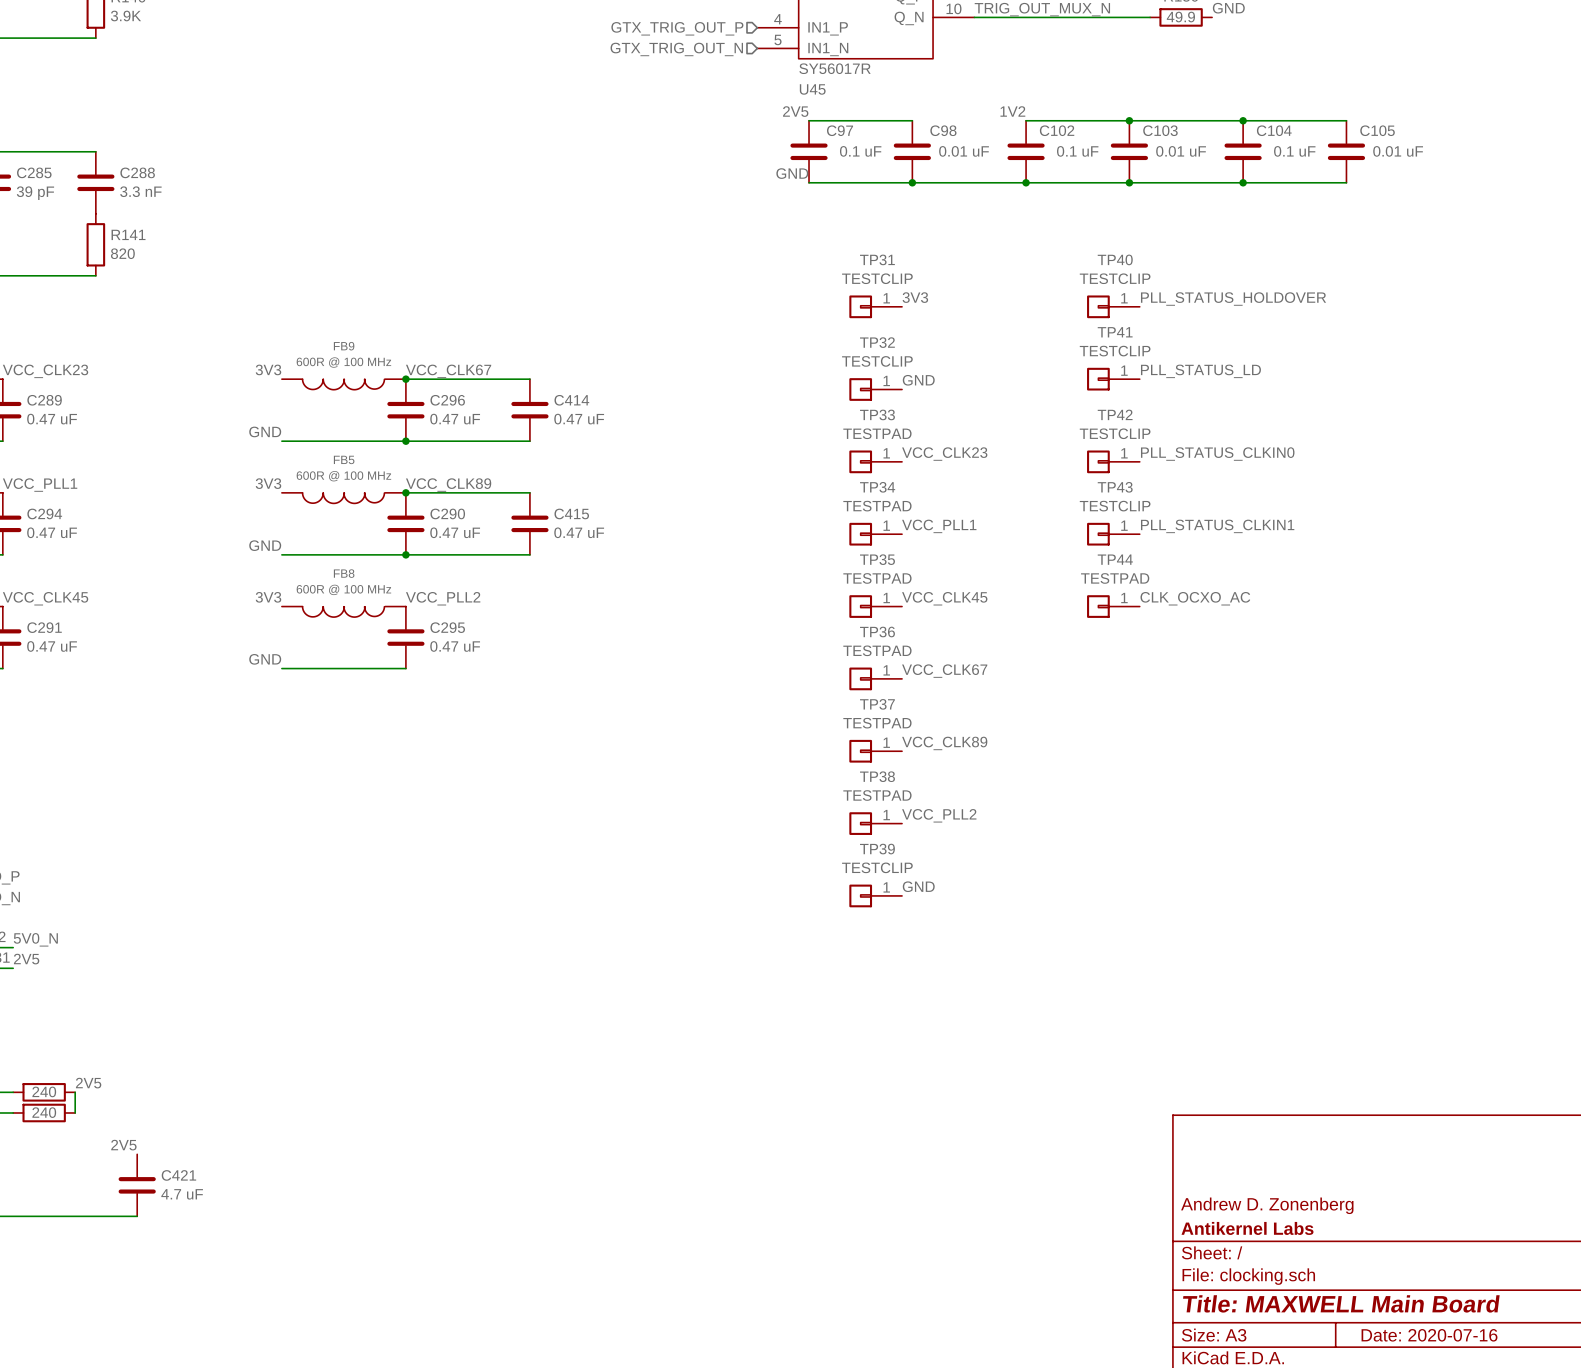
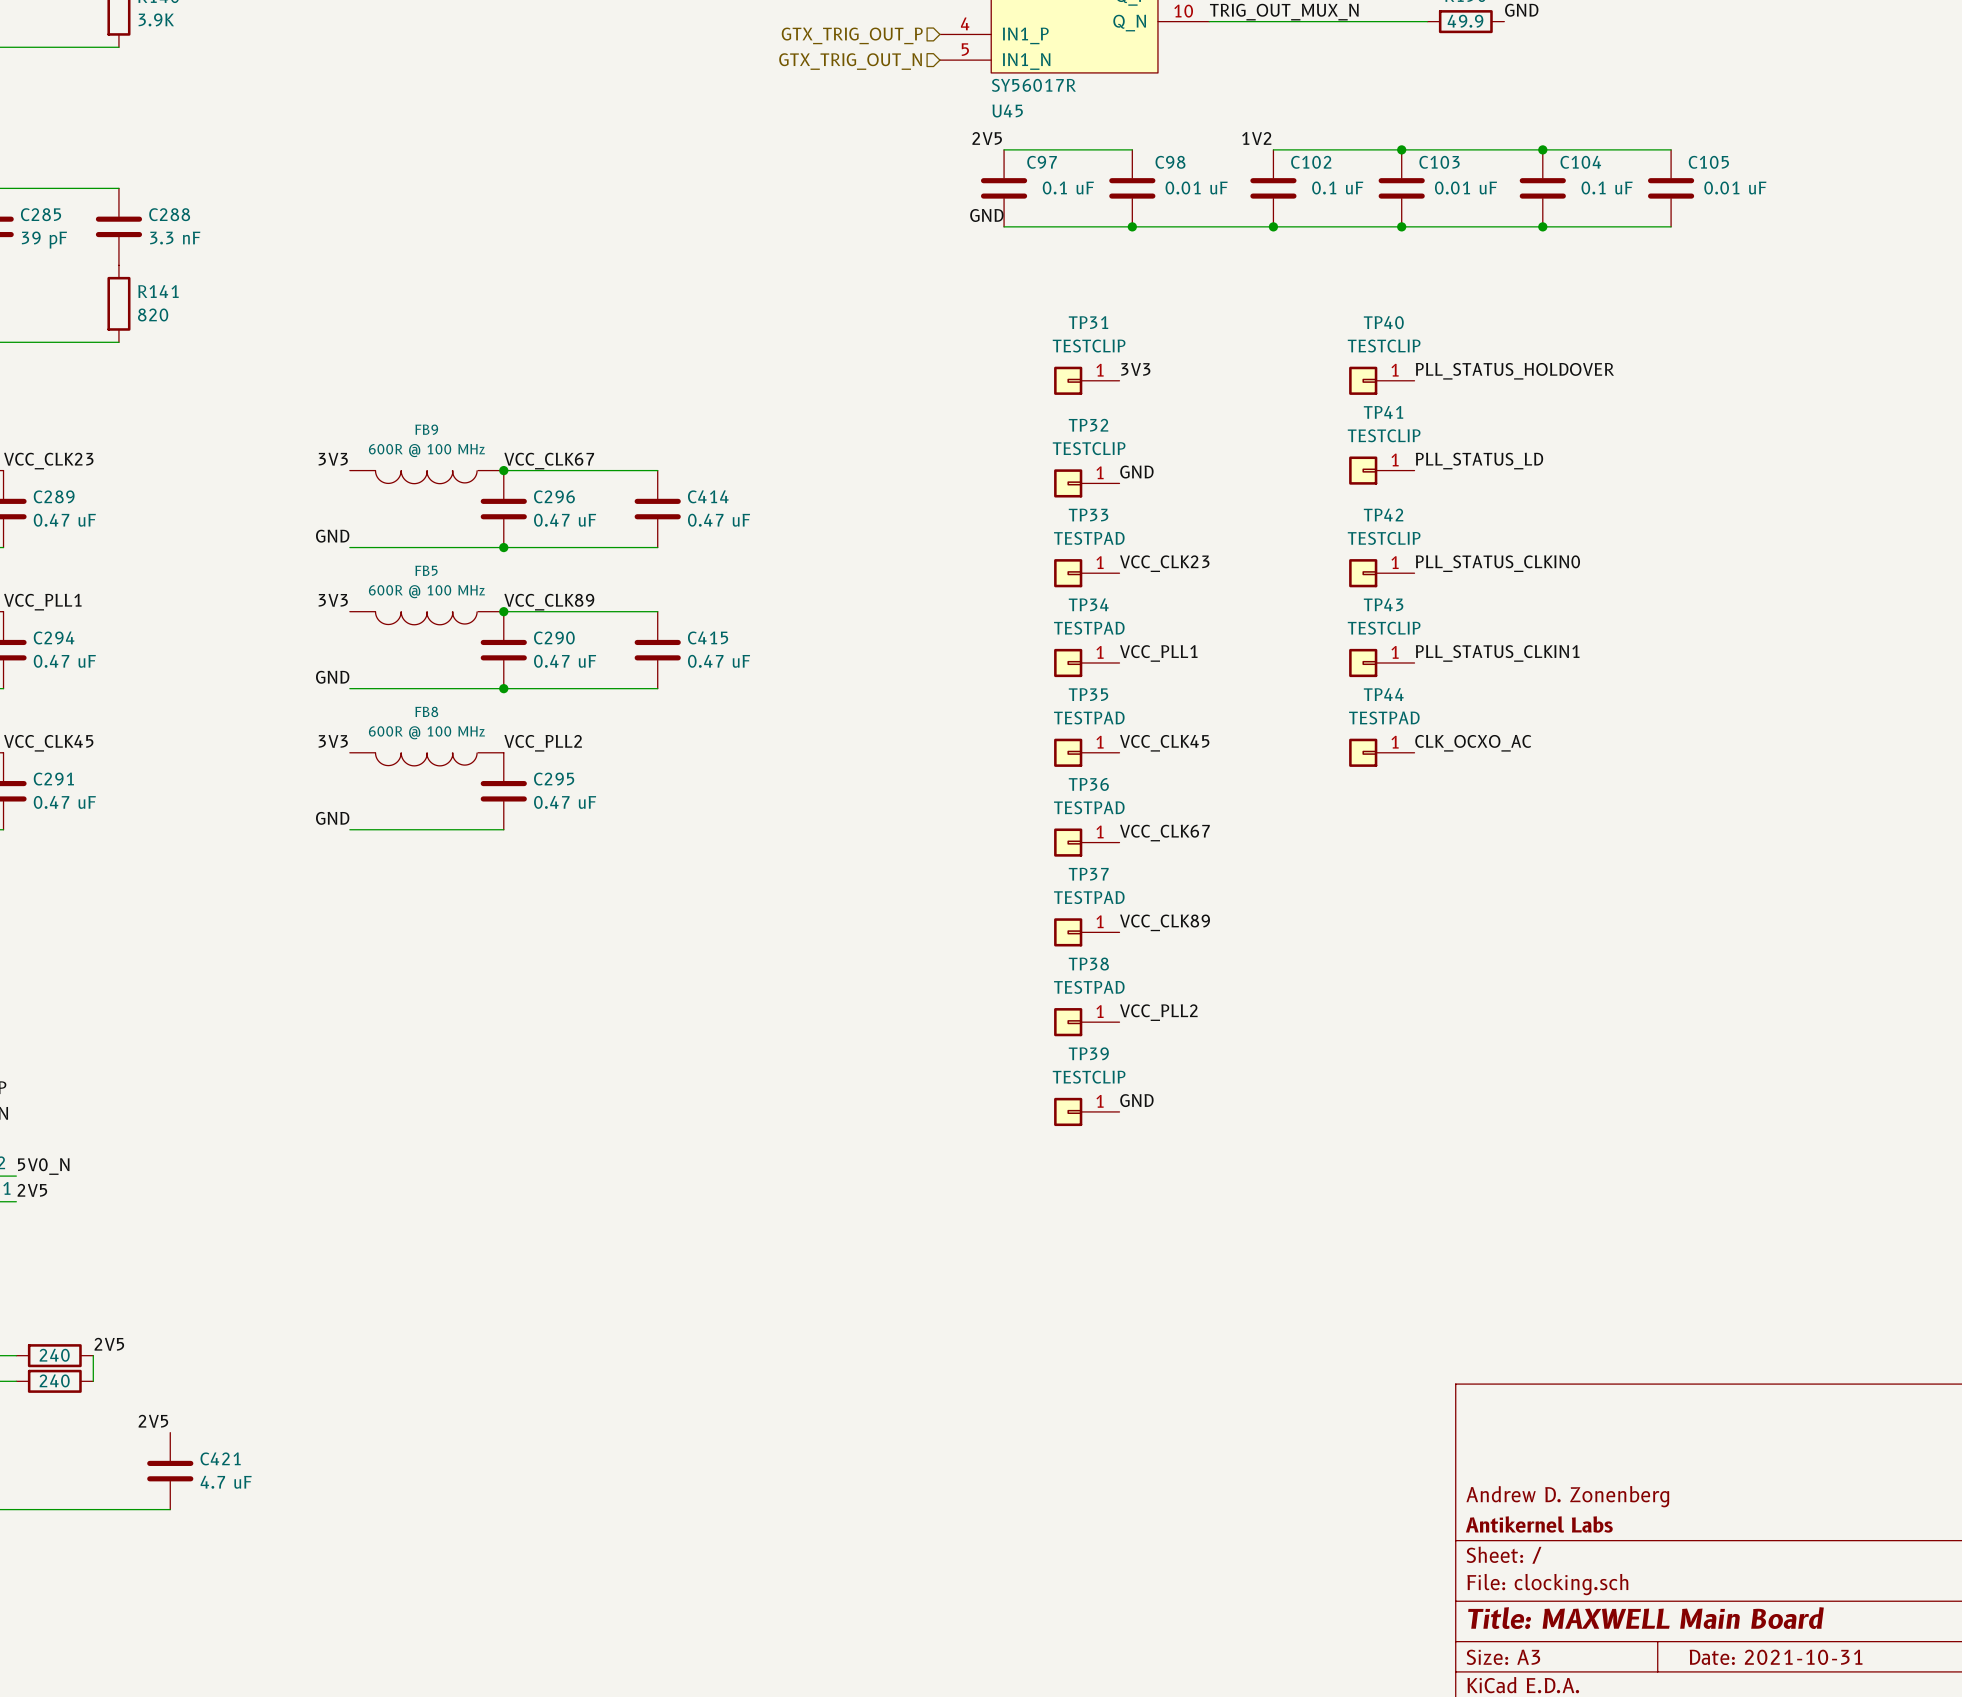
title block: Date: 2020-07-16 (1429, 1335) -> Date: 2021-10-31 (1776, 1657)

